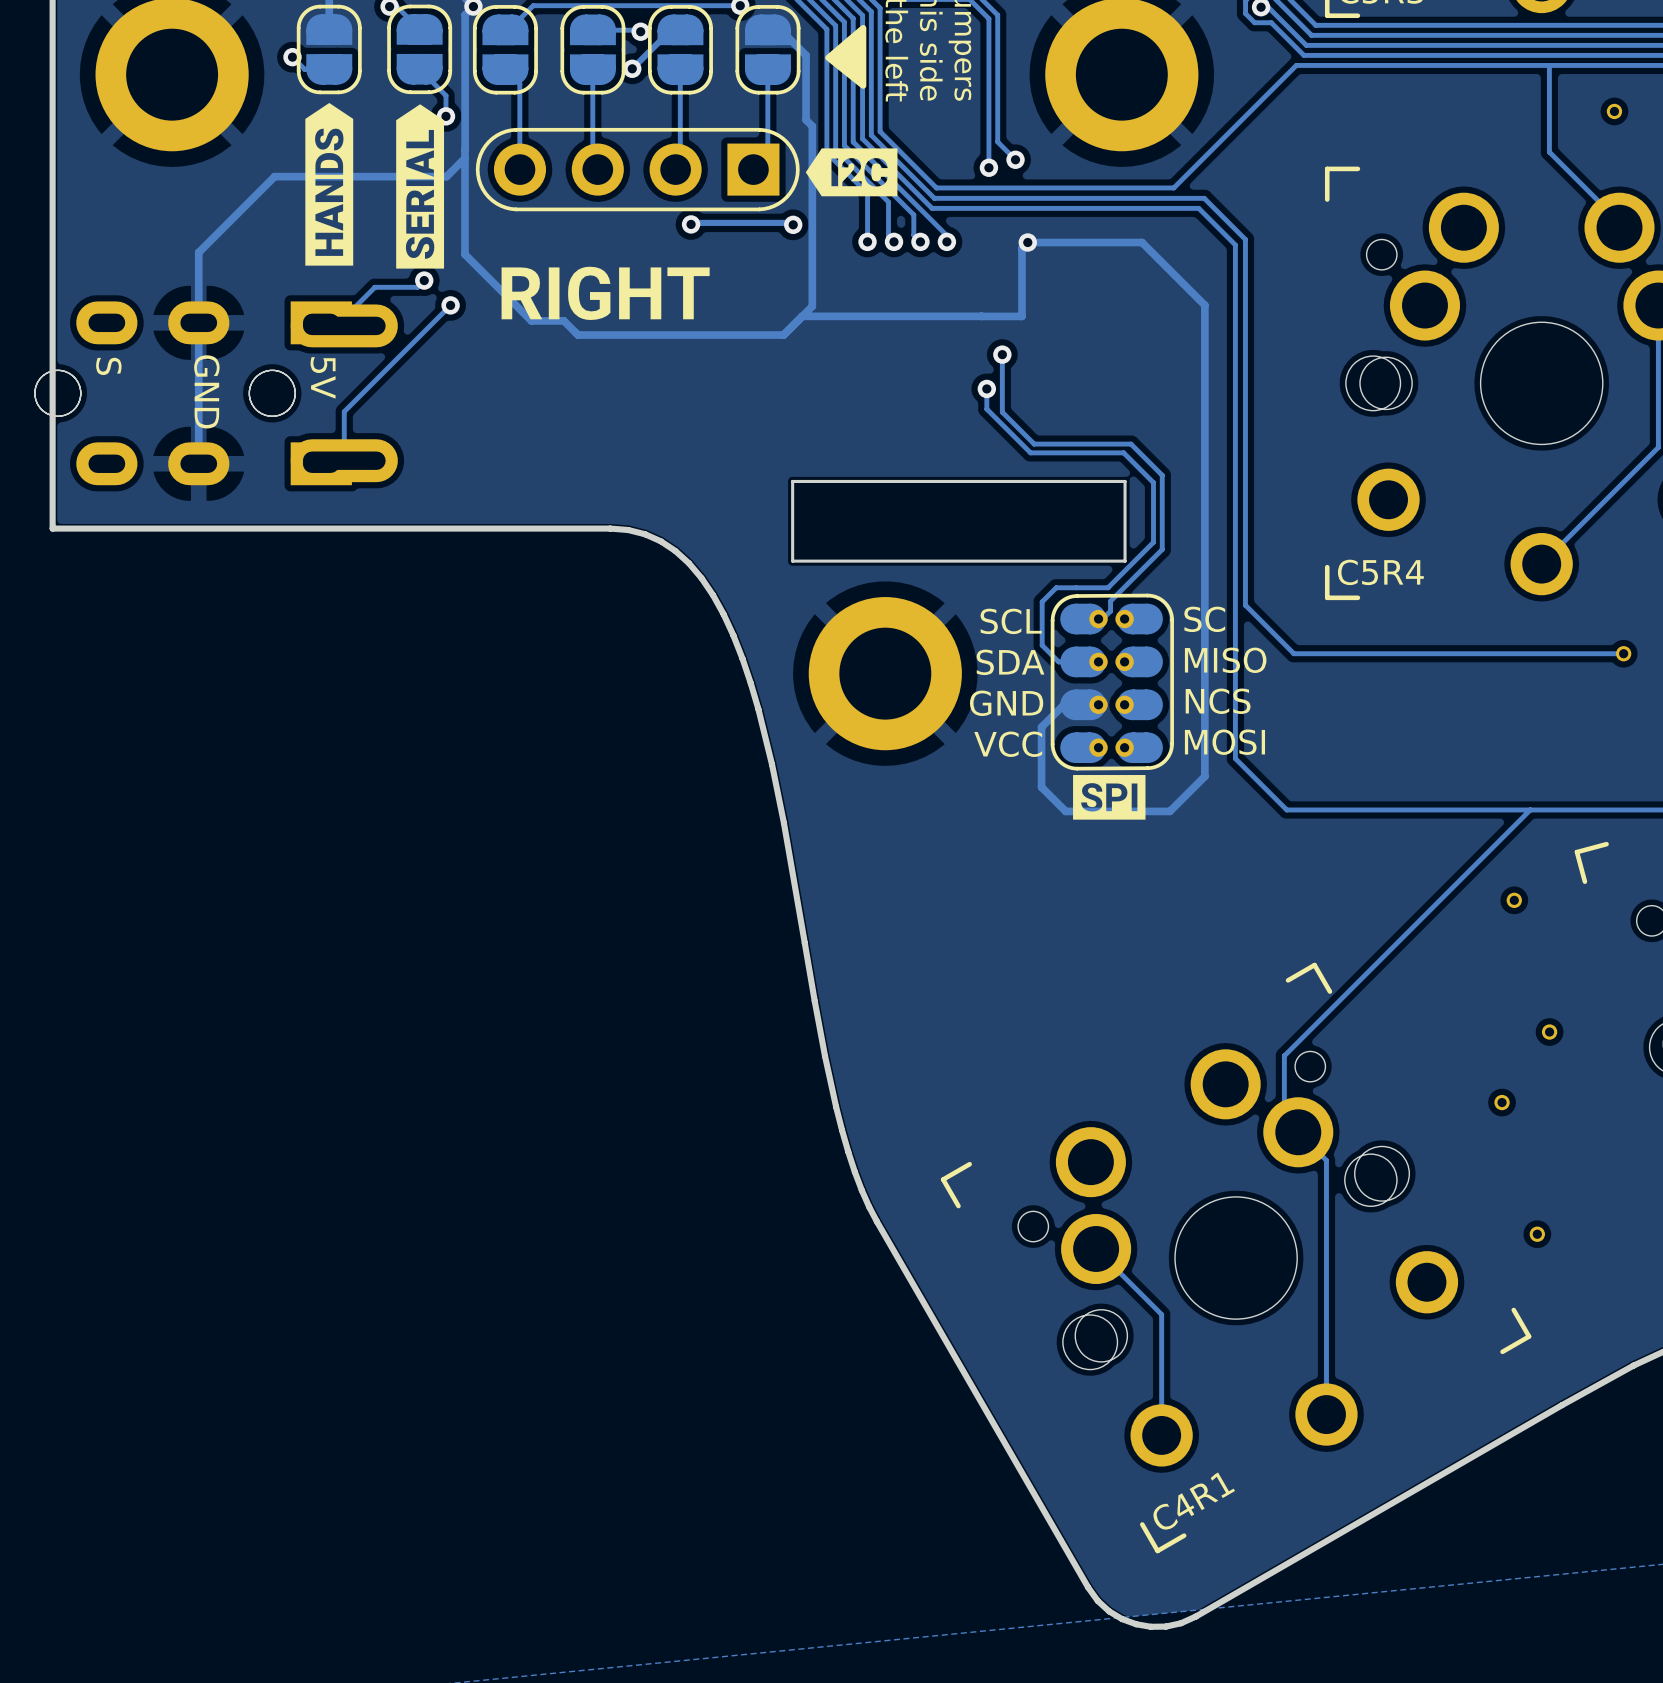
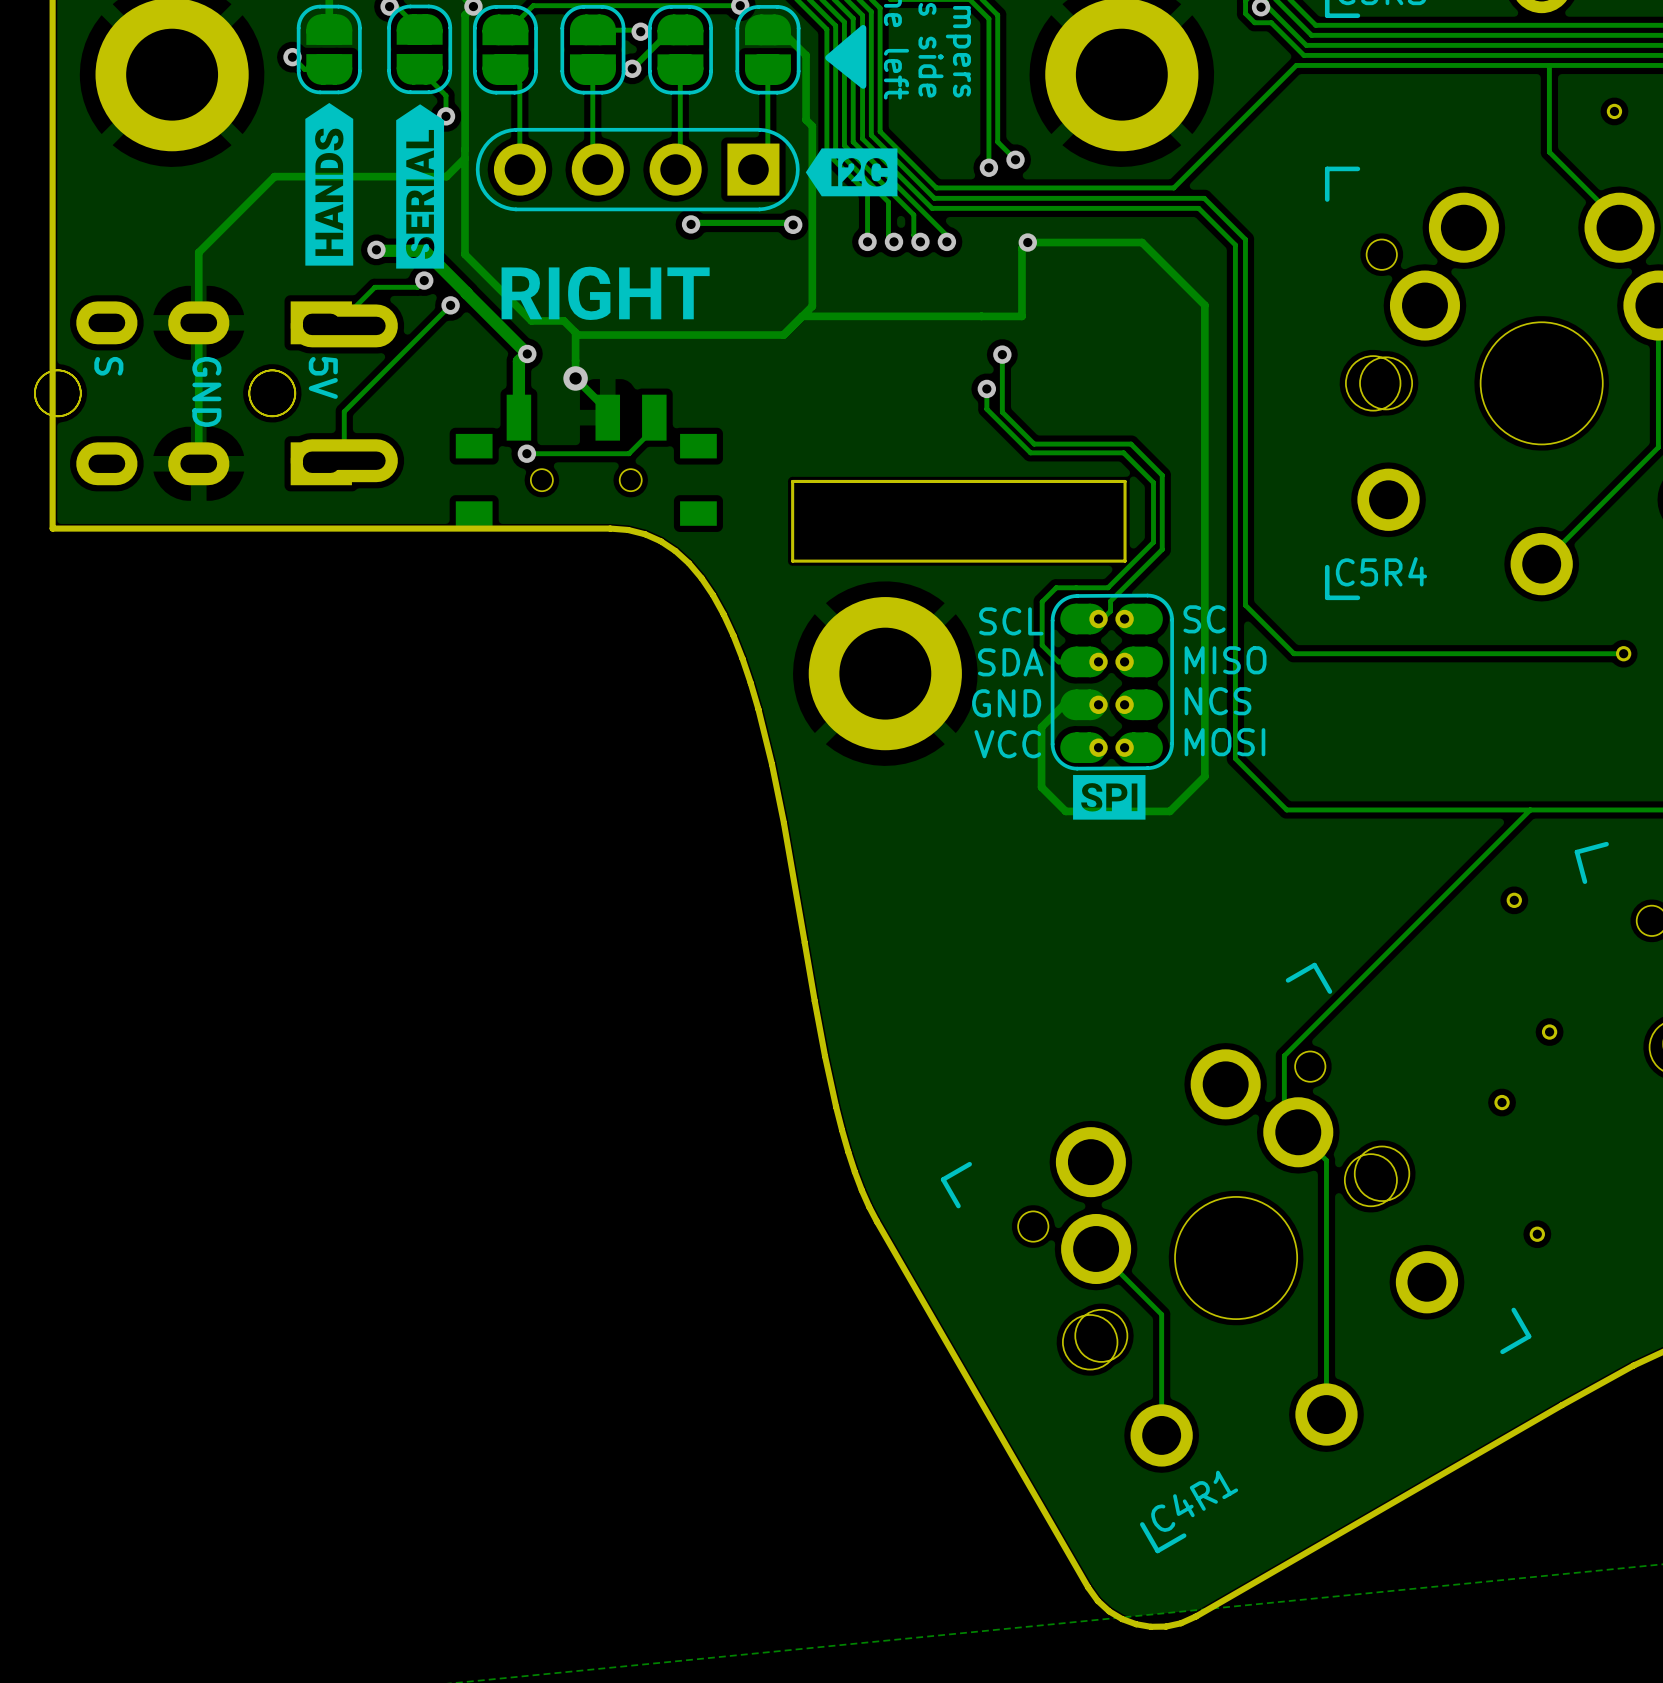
track: none -> (376, 249) (424, 250) (466, 292)
via: none -> (376, 249)
track: none -> (466, 293) (527, 353) (518, 361) (518, 417)
track: none -> (575, 332) (575, 378) (607, 410) (607, 417)
via: none -> (527, 353)
via: none -> (575, 378)
track: none -> (654, 417) (654, 428) (629, 453) (526, 453)
via: none -> (526, 453)
part: none -> (586, 460)

